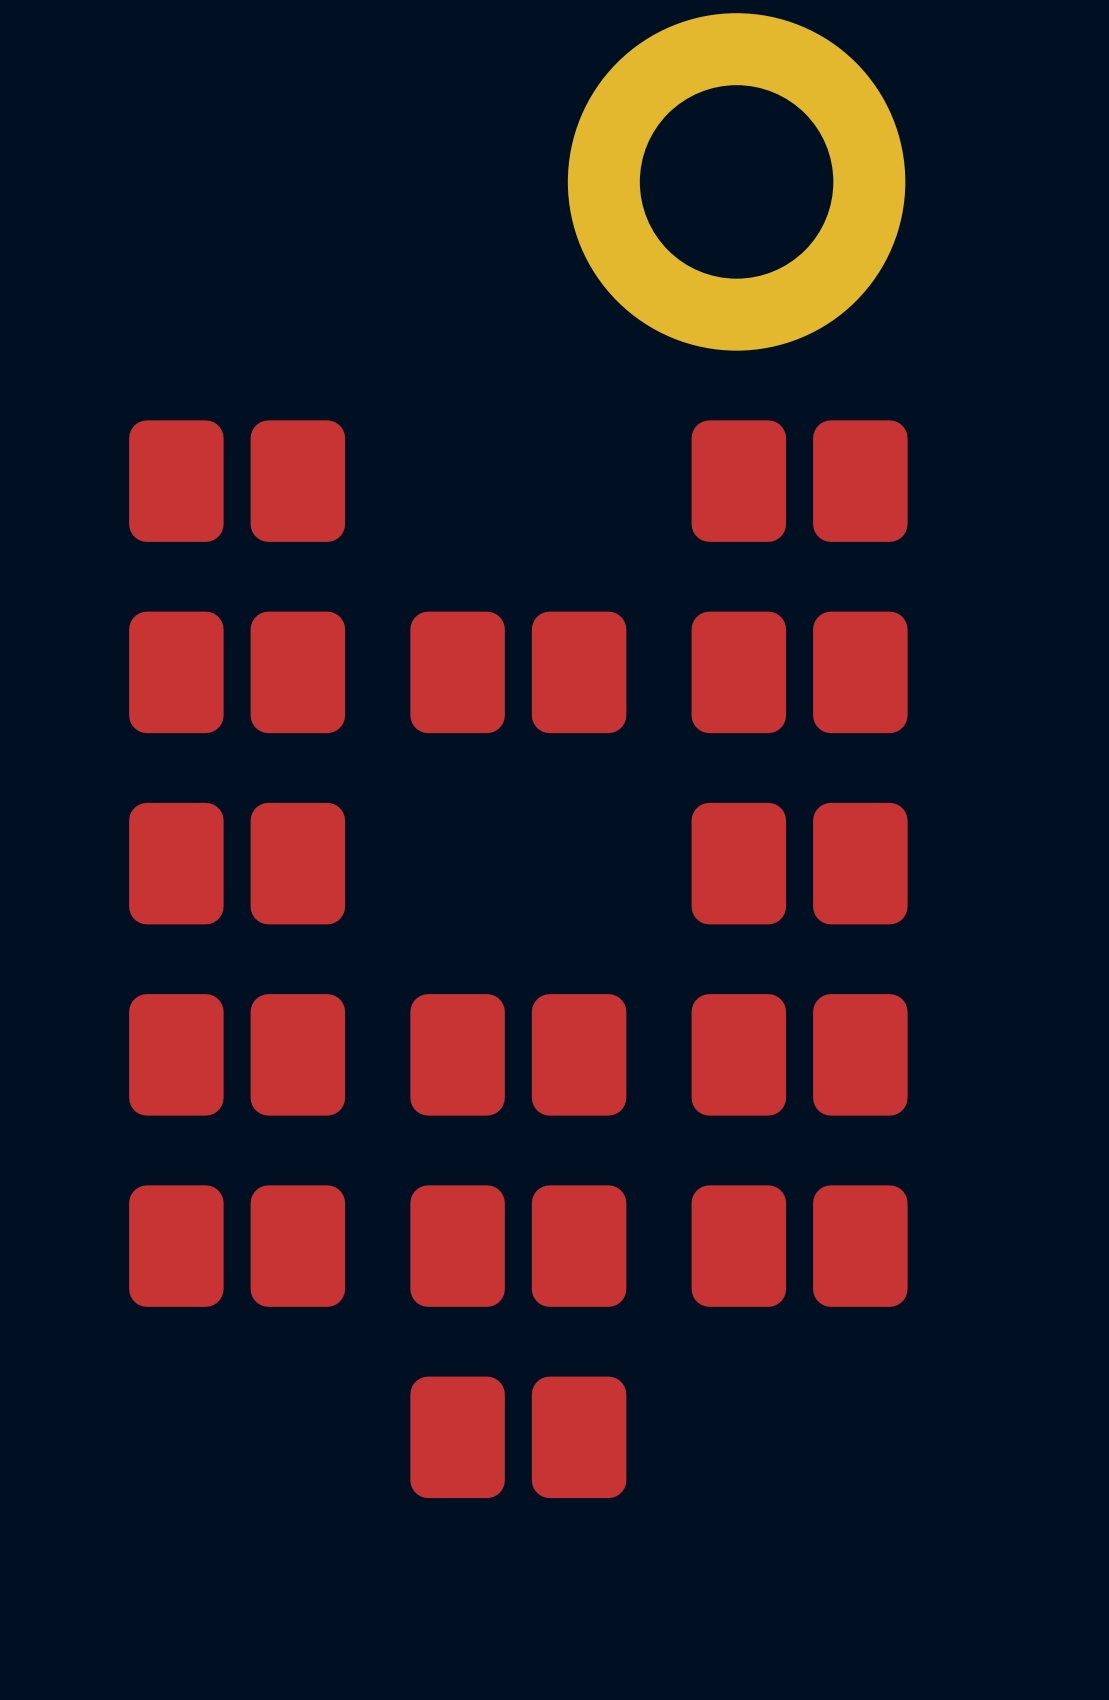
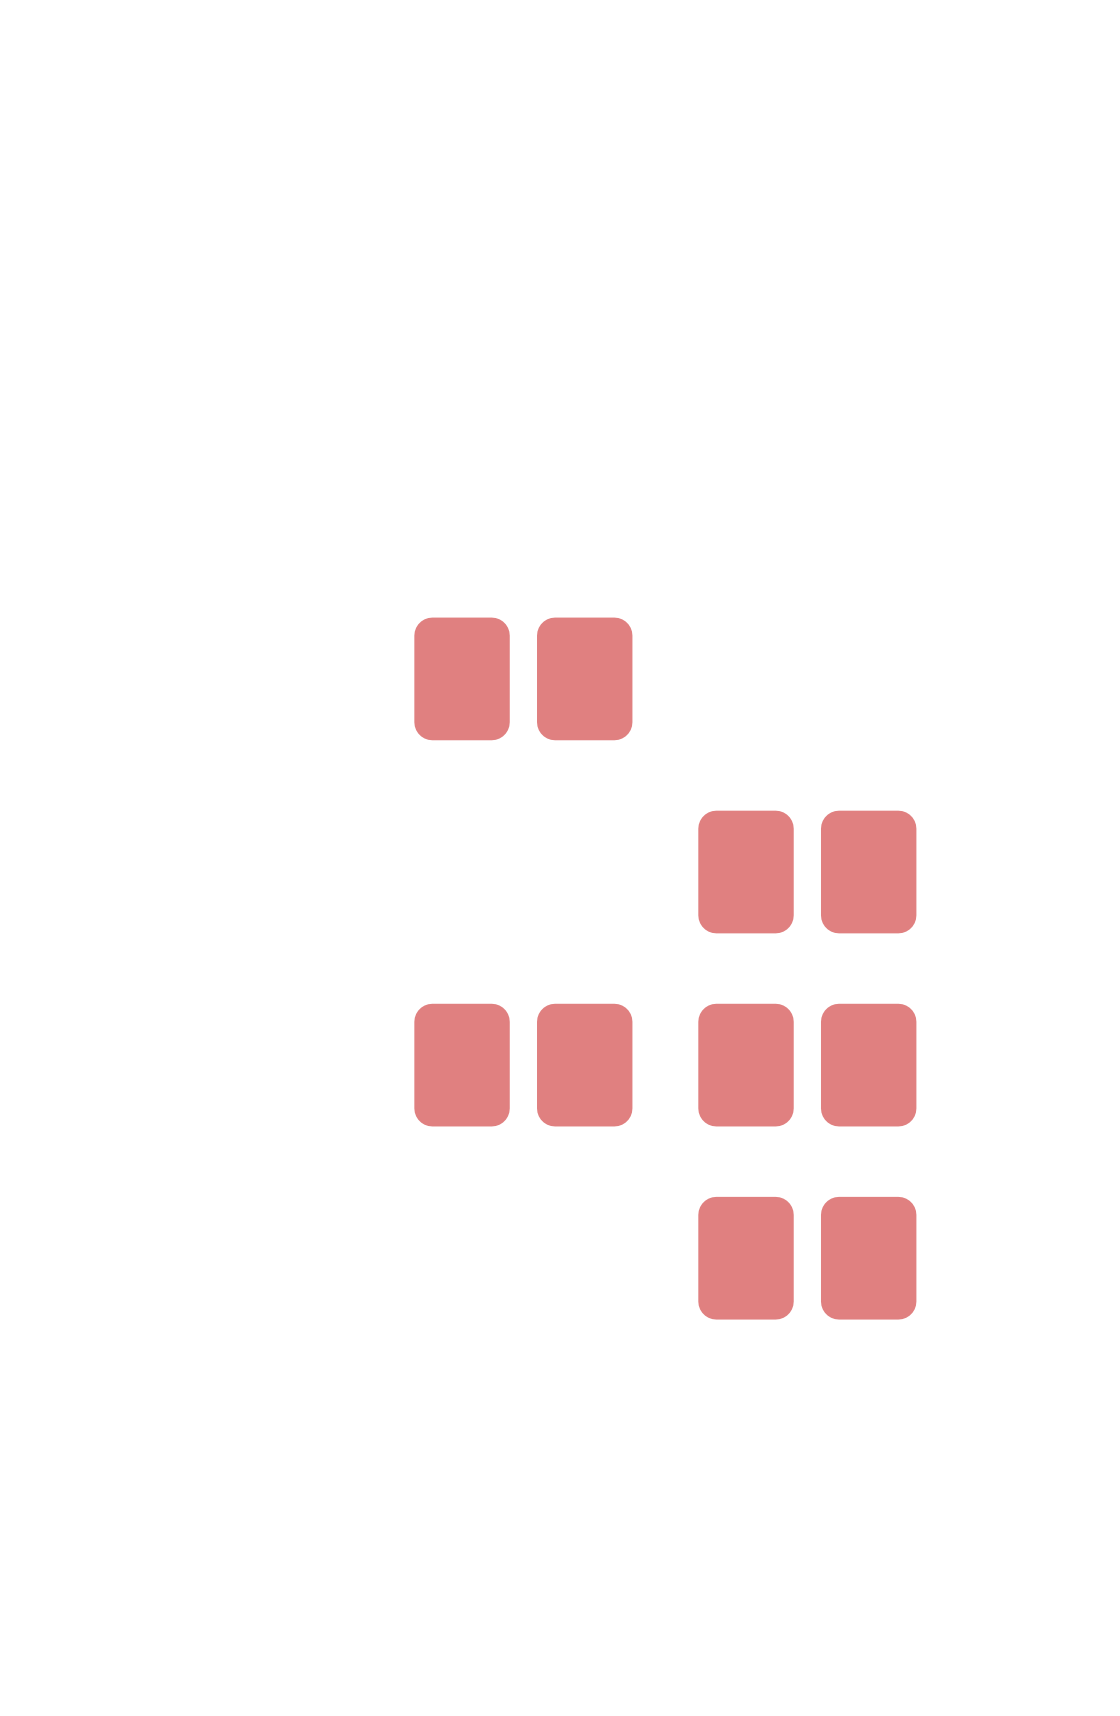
part: (736, 181) -> none
part: (237, 481) -> none
part: (799, 481) -> none
part: (237, 672) -> none
part: (799, 672) -> none
part: (237, 863) -> none
part: (237, 1054) -> none
part: (237, 1246) -> none
part: (518, 1246) -> none
part: (518, 1437) -> none

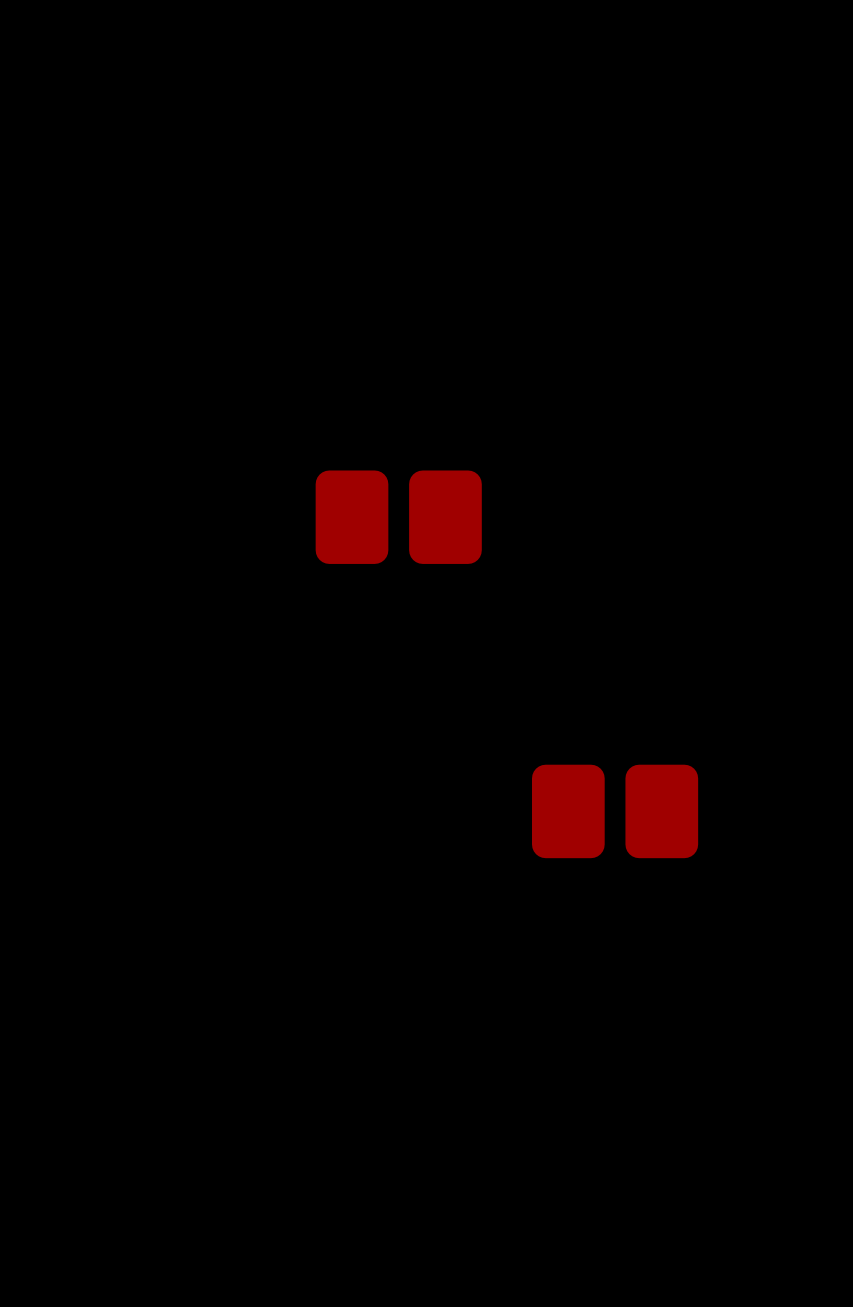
part: (807, 872) -> none
part: (523, 1065) -> none
part: (807, 1258) -> none

